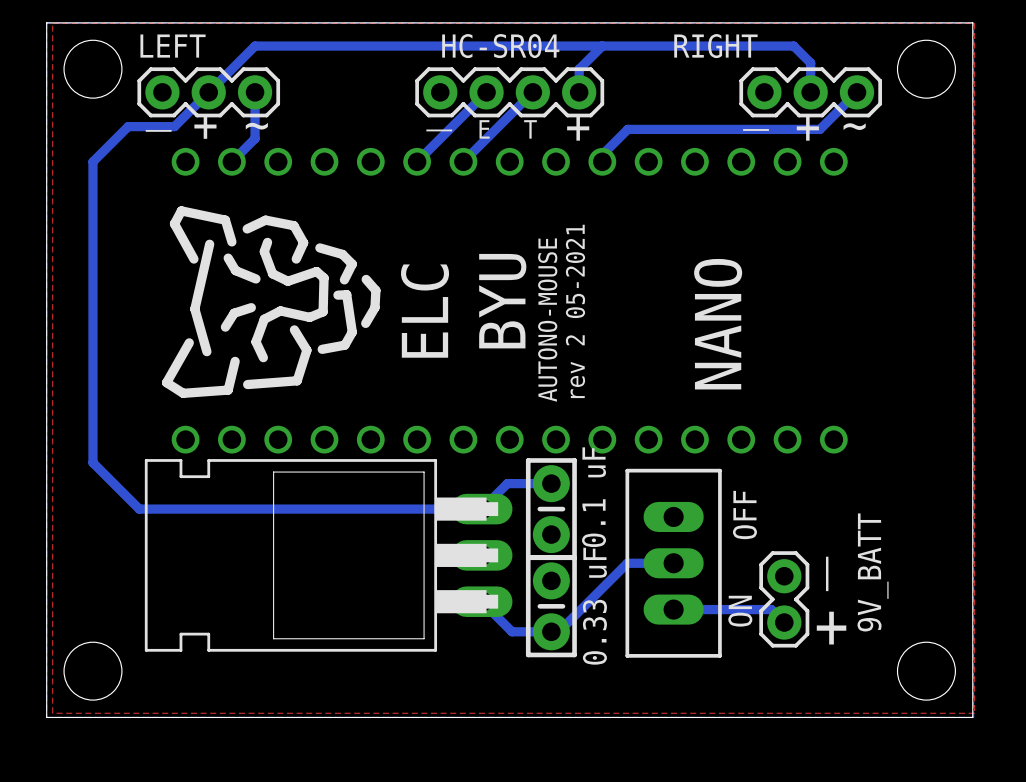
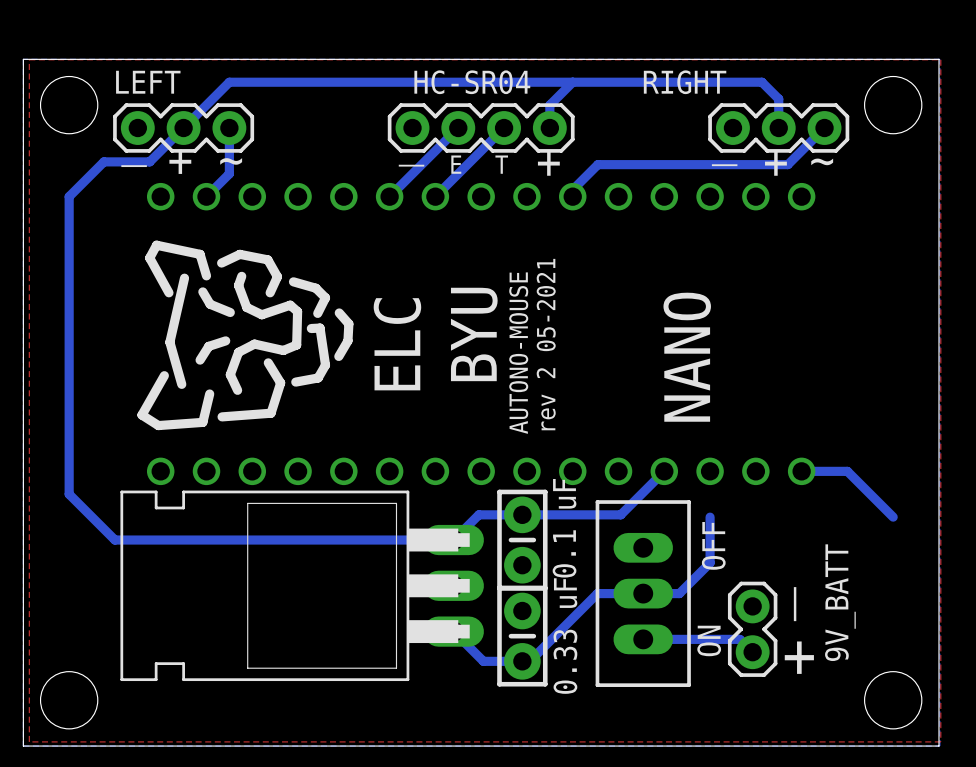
bottom track: none -> (664, 471) (620, 514) (522, 514)
bottom track: none -> (801, 471) (847, 471) (893, 517)
bottom track: none -> (710, 517) (710, 562) (679, 593) (643, 593)

